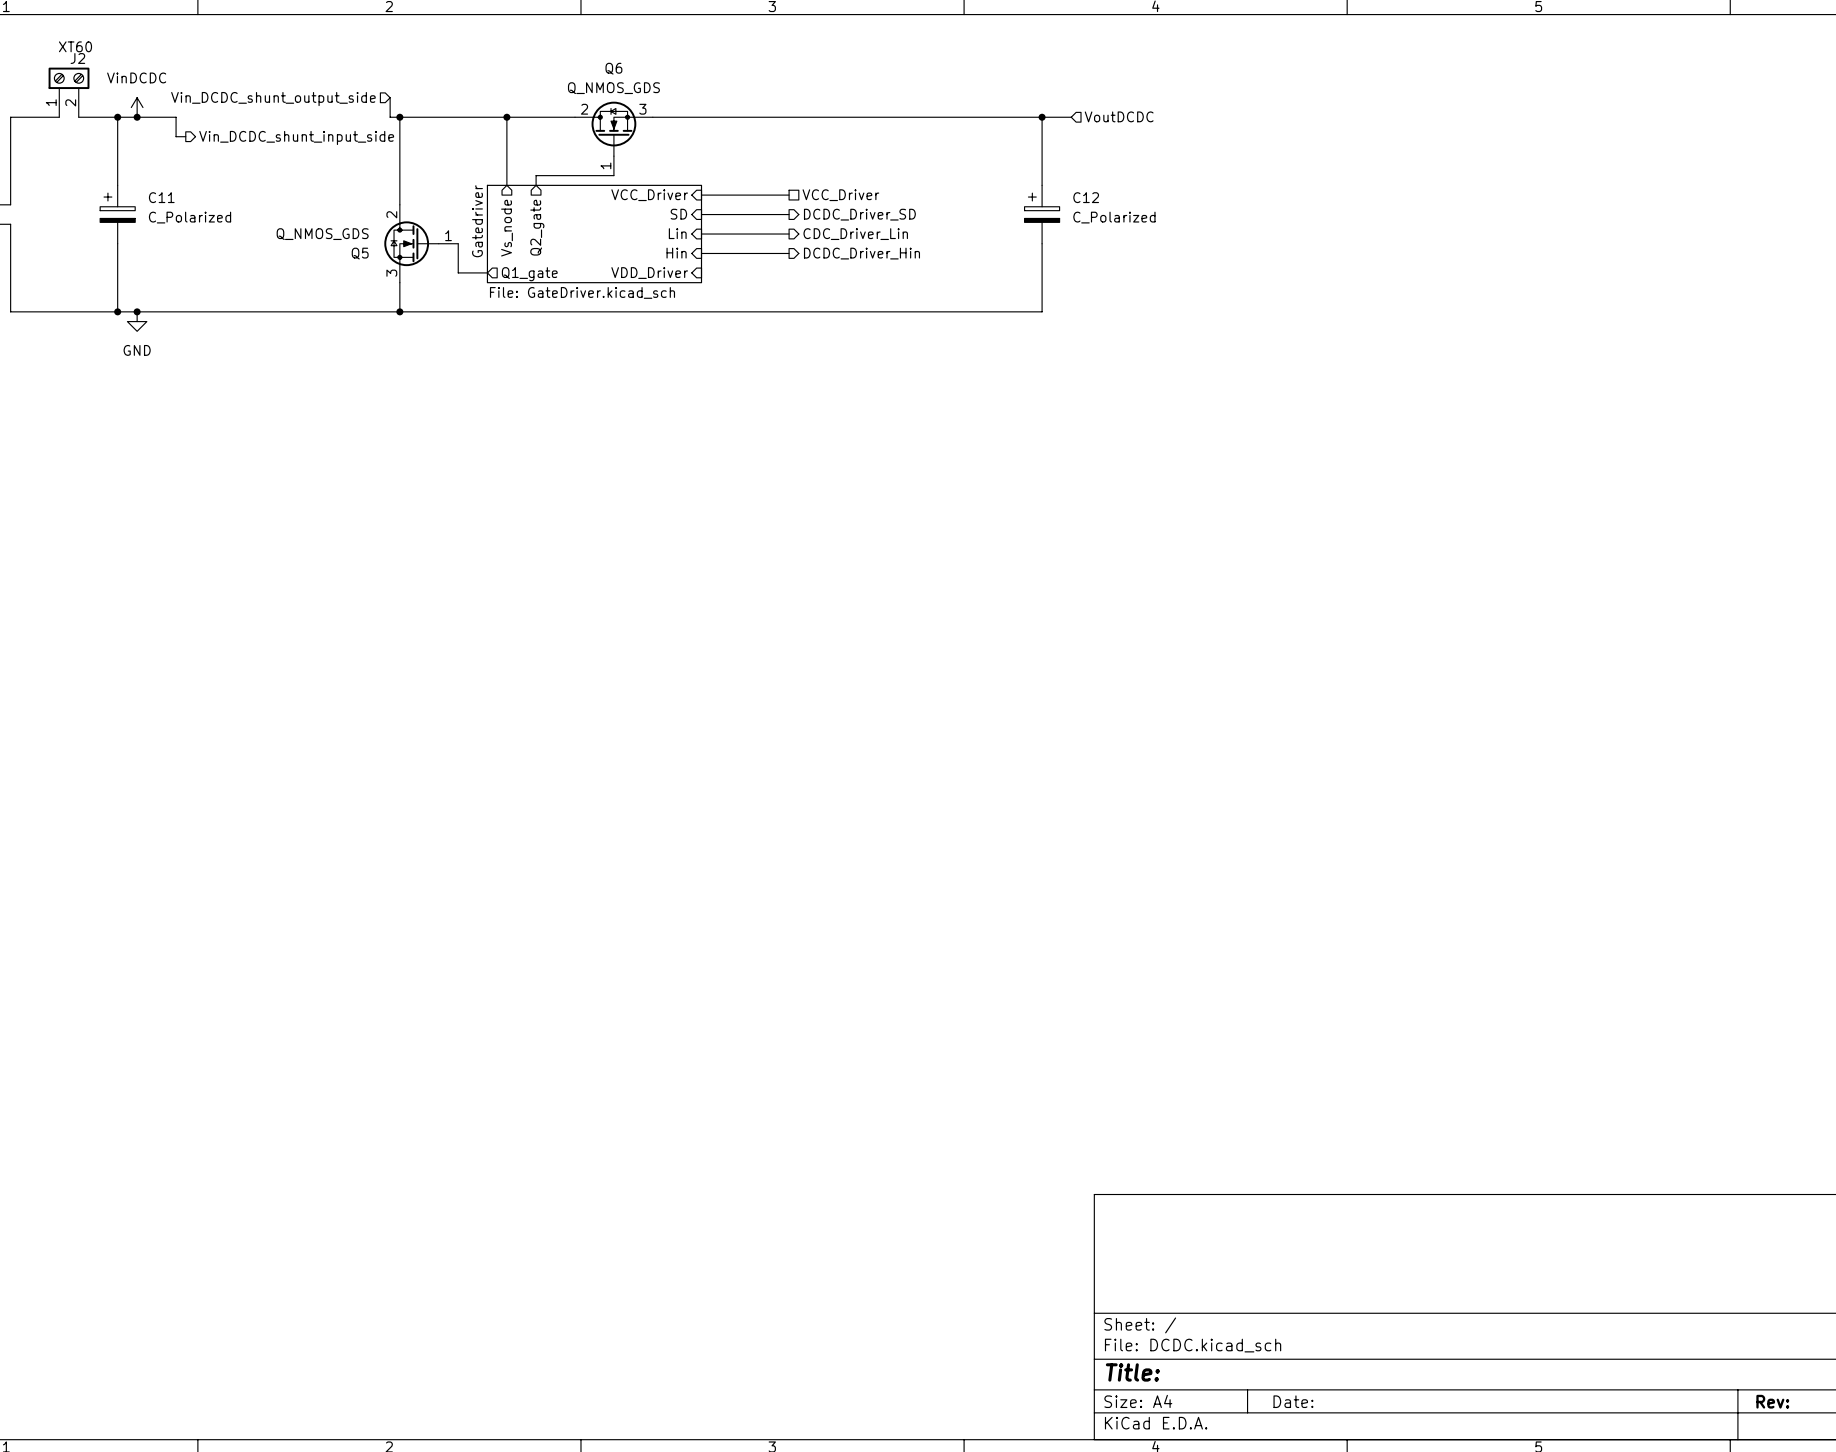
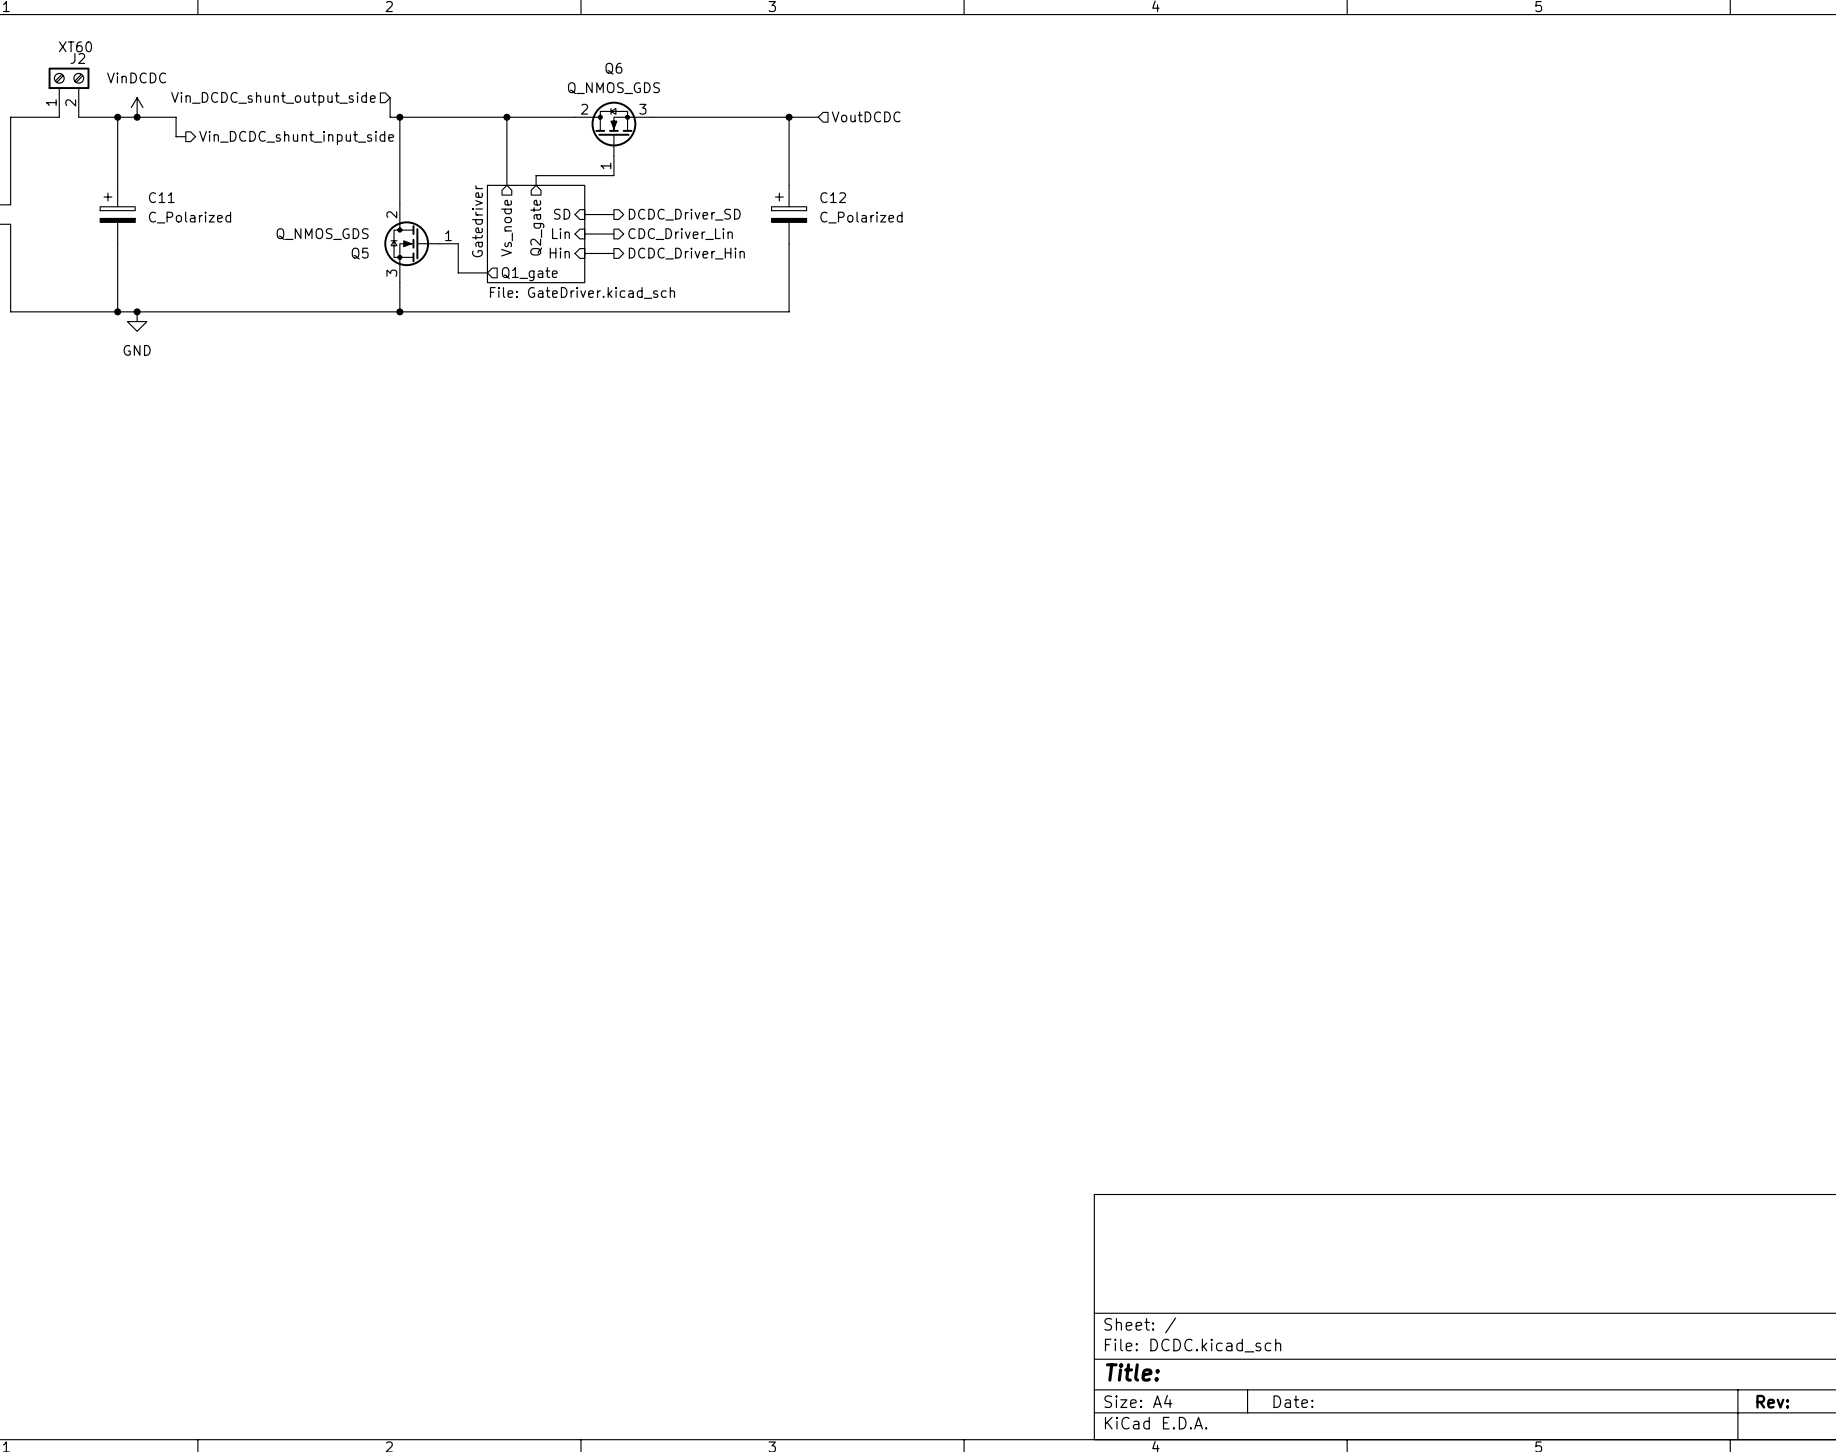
hierarchical label: none -> VoutDCDC (866, 116)
hierarchical label: VoutDCDC (1119, 116) -> none
wire: none -> (789, 117) (789, 185)
junction: none -> (789, 117)
wire: (818, 117) (1071, 117) -> none
wire: (1042, 117) (1042, 185) -> none
junction: (1042, 117) -> none
sheet pin: VCC_Driver (649, 195) -> none
wire: (701, 195) (789, 195) -> none
hierarchical label: VCC_Driver (840, 195) -> none
wire: none -> (584, 214) (613, 214)
sheet pin position: SD (678, 214) -> SD (562, 214)
wire: (701, 214) (789, 214) -> none
hierarchical label position: DCDC_Driver_SD (859, 214) -> DCDC_Driver_SD (684, 214)
C12 position: (1042, 214) -> (789, 214)
sheet pin position: Lin (677, 233) -> Lin (560, 233)
sheet Gatedriver: none -> File: GateDriver.kicad_sch (536, 234)
wire: none -> (584, 234) (613, 234)
sheet Gatedriver: File: GateDriver.kicad_sch (594, 234) -> none
wire: (701, 234) (789, 234) -> none
hierarchical label position: CDC_Driver_Lin (855, 234) -> CDC_Driver_Lin (680, 234)
wire: (1042, 243) (1042, 311) (789, 311) -> (789, 243) (789, 311)
wire: none -> (584, 253) (613, 253)
sheet pin position: Hin (676, 253) -> Hin (559, 253)
wire: (701, 253) (789, 253) -> none
hierarchical label position: DCDC_Driver_Hin (861, 253) -> DCDC_Driver_Hin (686, 253)
sheet pin: VDD_Driver (649, 273) -> none

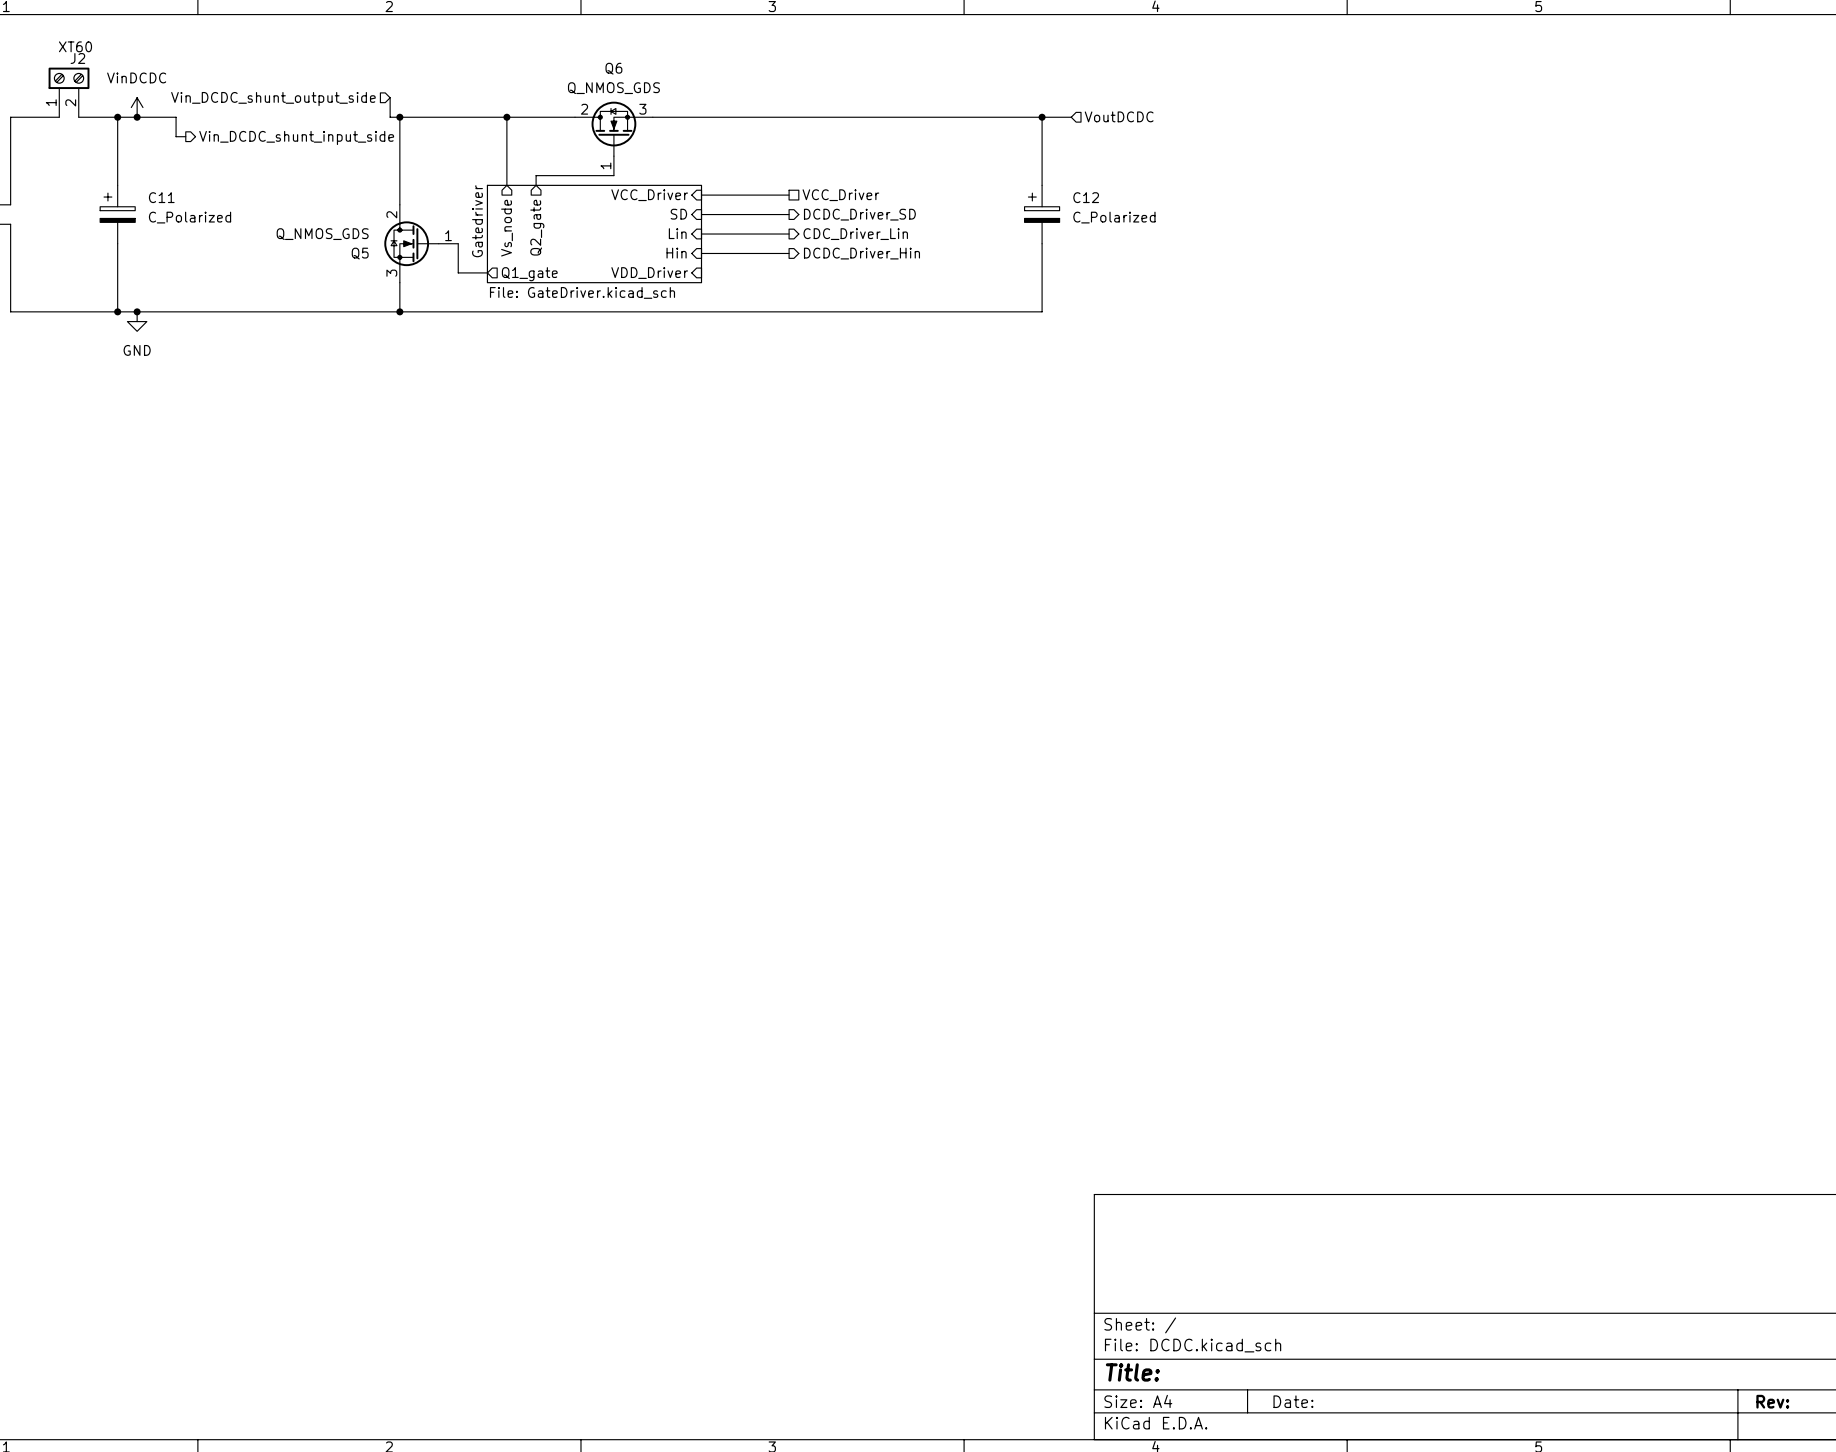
hierarchical label: VoutDCDC (866, 116) -> none
hierarchical label: none -> VoutDCDC (1119, 116)
wire: (789, 117) (789, 185) -> none
junction: (789, 117) -> none
wire: none -> (818, 117) (1071, 117)
wire: none -> (1042, 117) (1042, 185)
junction: none -> (1042, 117)
sheet pin: none -> VCC_Driver (649, 195)
wire: none -> (701, 195) (789, 195)
hierarchical label: none -> VCC_Driver (840, 195)
sheet pin position: SD (562, 214) -> SD (678, 214)
wire: (584, 214) (613, 214) -> none
hierarchical label position: DCDC_Driver_SD (684, 214) -> DCDC_Driver_SD (859, 214)
wire: none -> (701, 214) (789, 214)
C12 position: (789, 214) -> (1042, 214)
sheet pin position: Lin (560, 233) -> Lin (677, 233)
sheet Gatedriver: File: GateDriver.kicad_sch (536, 234) -> none
wire: (584, 234) (613, 234) -> none
sheet Gatedriver: none -> File: GateDriver.kicad_sch (594, 234)
hierarchical label position: CDC_Driver_Lin (680, 234) -> CDC_Driver_Lin (855, 234)
wire: none -> (701, 234) (789, 234)
wire: (789, 243) (789, 311) -> (1042, 243) (1042, 311) (789, 311)
sheet pin position: Hin (559, 253) -> Hin (676, 253)
wire: (584, 253) (613, 253) -> none
hierarchical label position: DCDC_Driver_Hin (686, 253) -> DCDC_Driver_Hin (861, 253)
wire: none -> (701, 253) (789, 253)
sheet pin: none -> VDD_Driver (649, 273)

